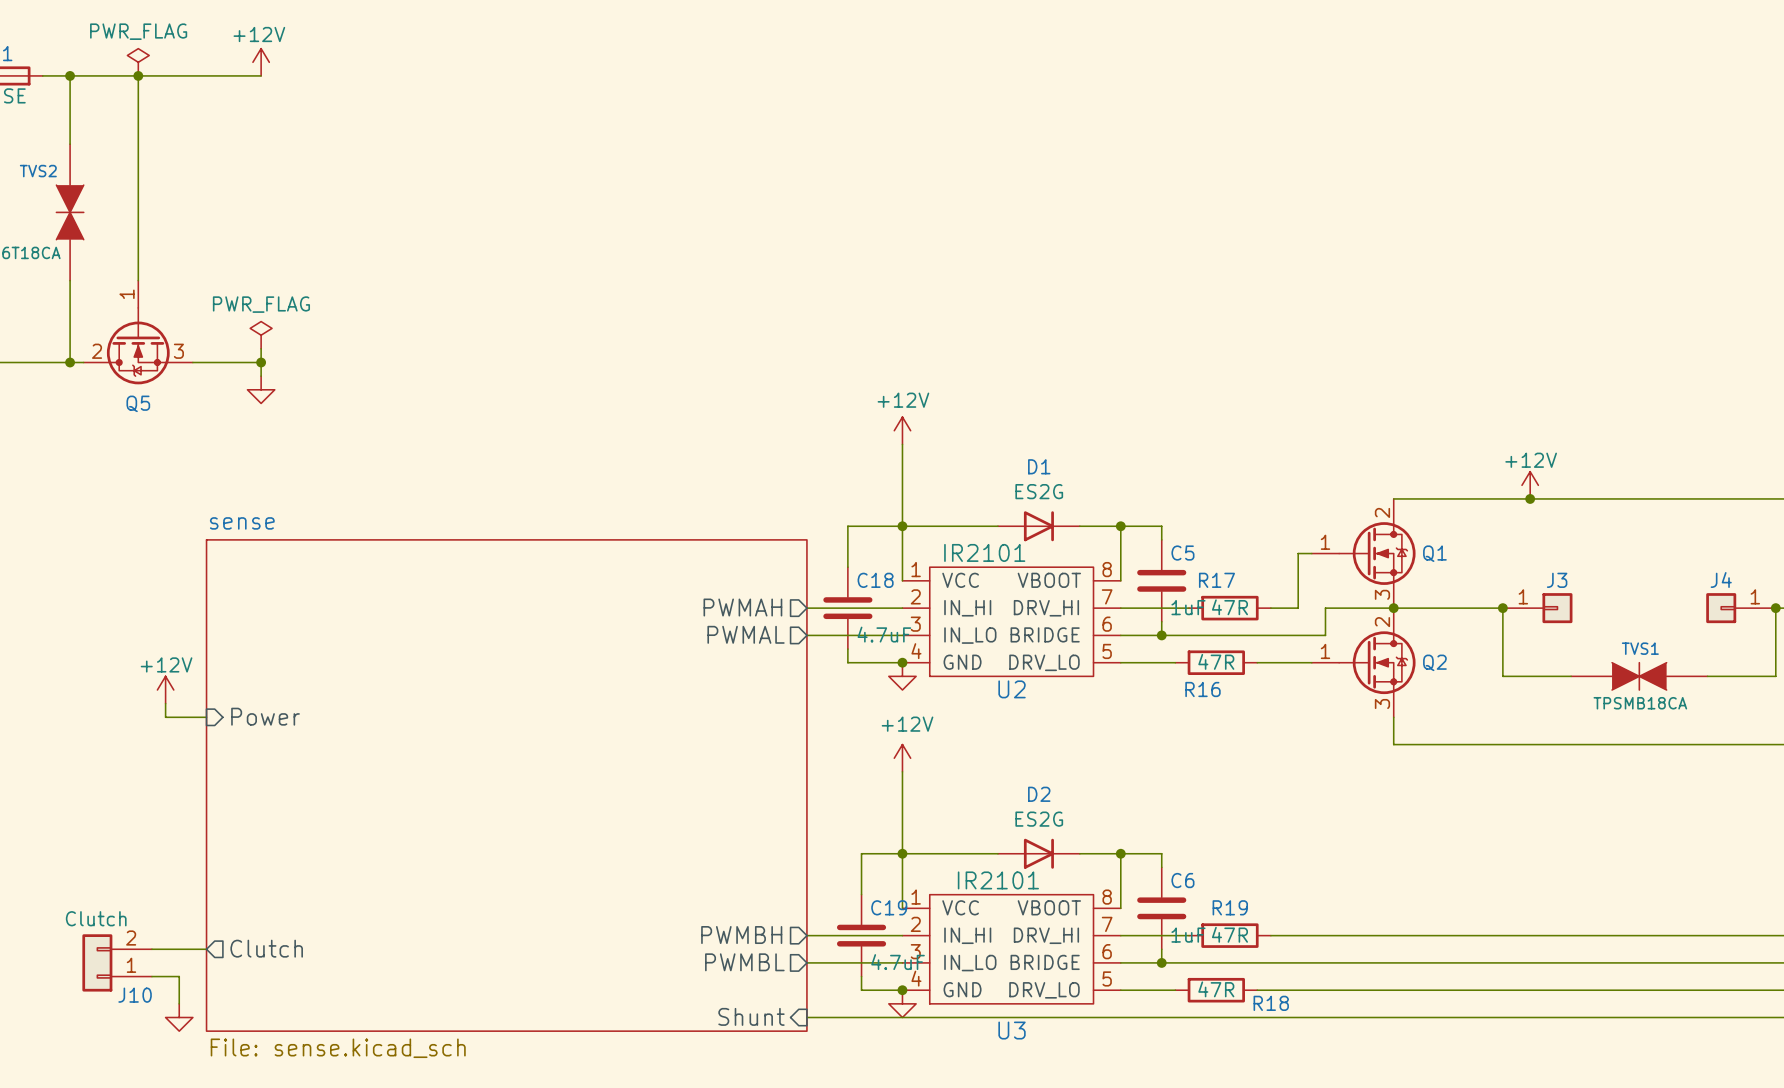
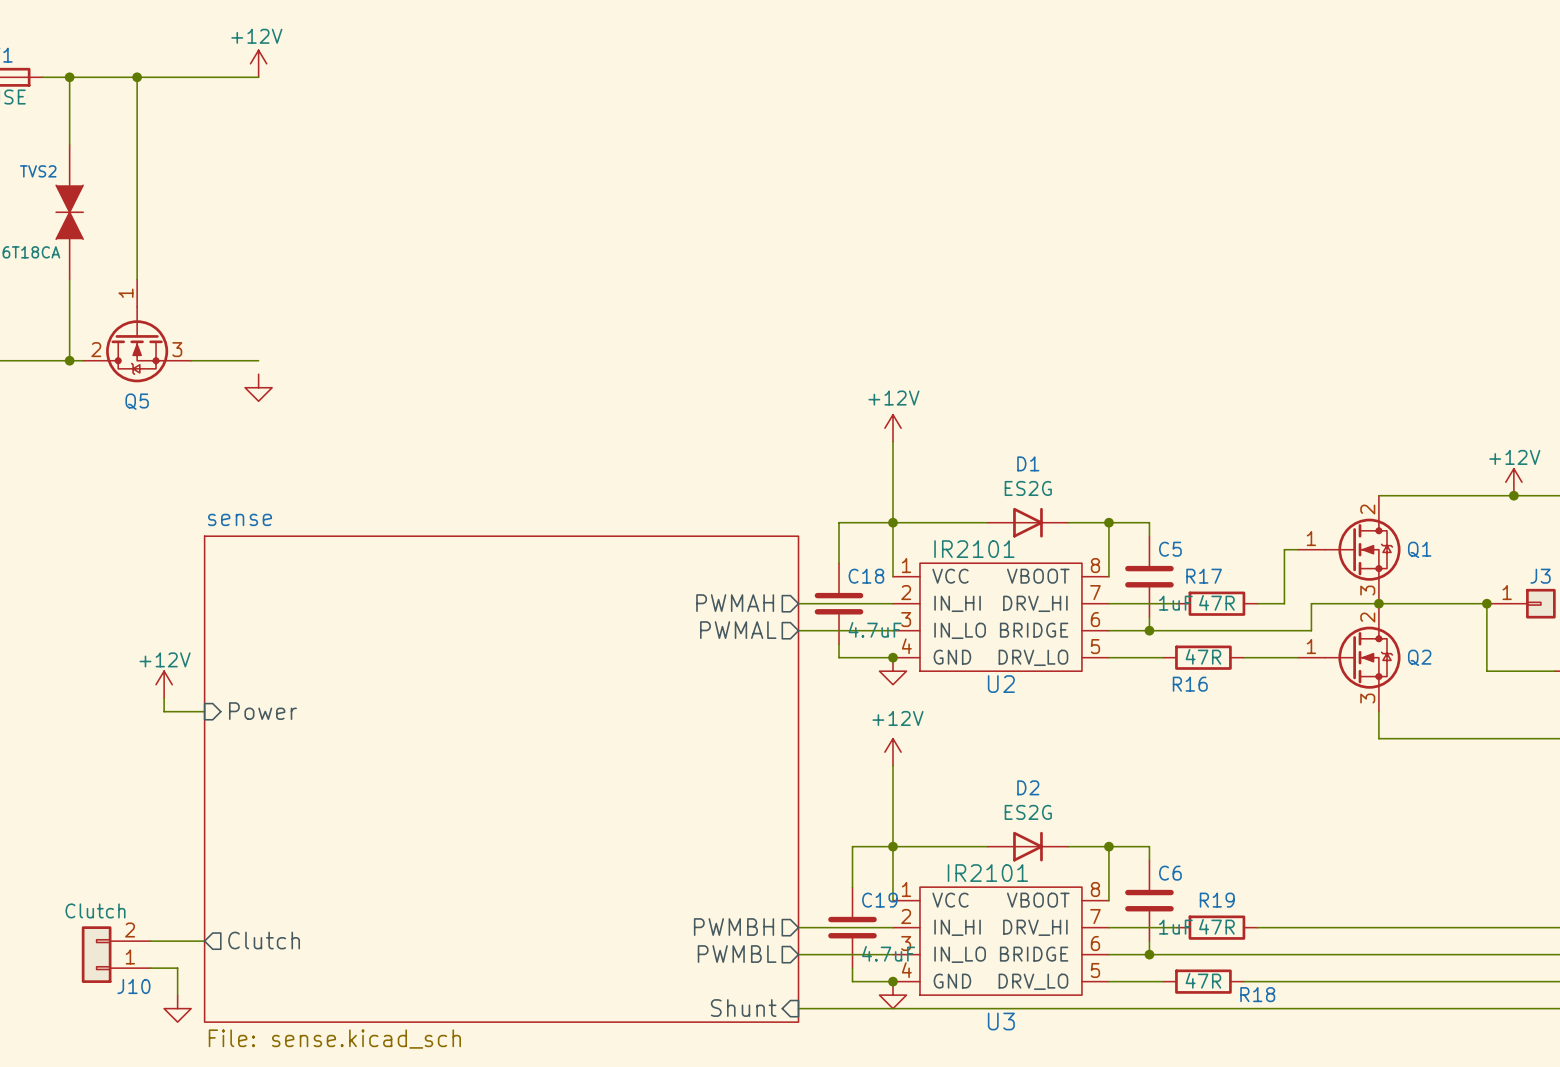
power symbol: PWR_FLAG (138, 62) -> none
power symbol: PWR_FLAG (261, 335) -> none
wire: (261, 348) (261, 376) -> none
junction: (261, 362) -> none

